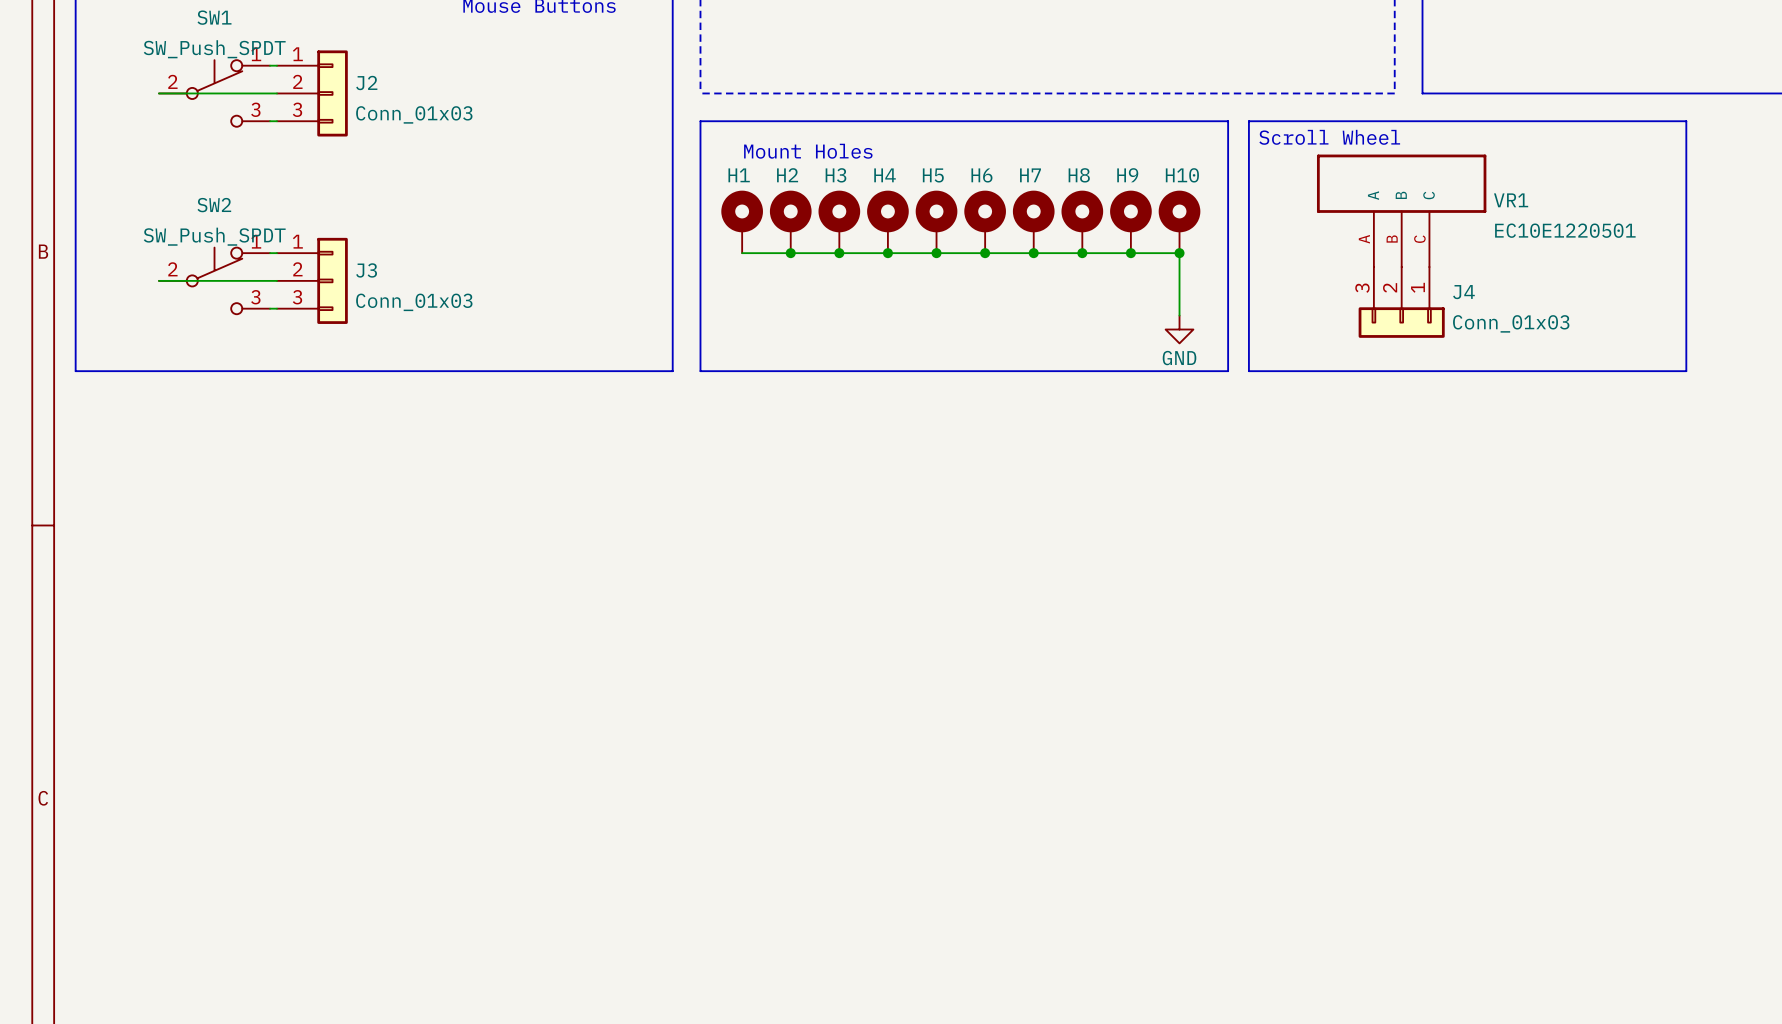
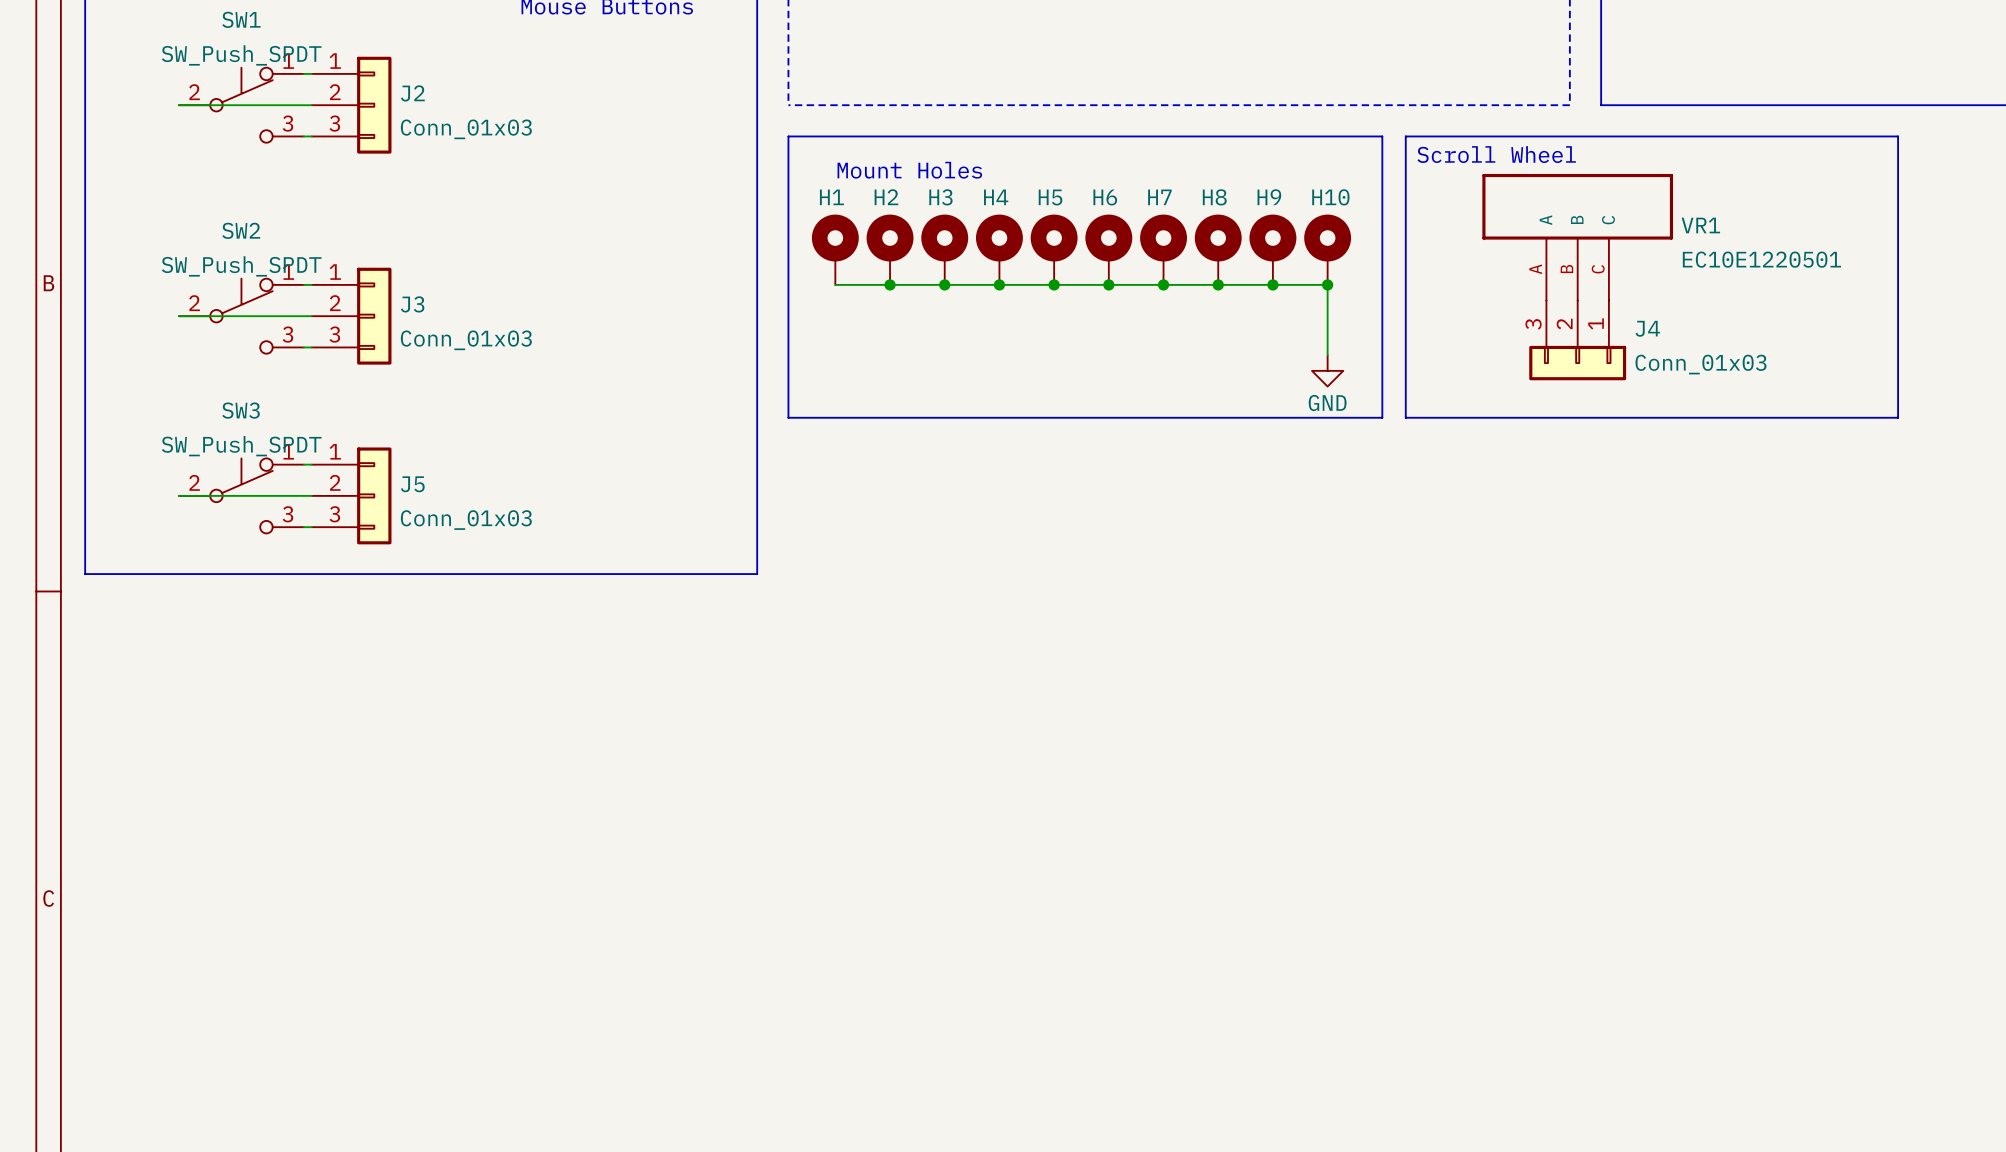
line: (75, 371) (672, 371) -> (85, 417) (85, 574) (757, 574) (757, 417)
wire: none -> (303, 464) (311, 464)
wire: none -> (178, 495) (311, 495)
SW3: none -> SW_Push_SPDT (241, 495)
J5: none -> Conn_01x03 (351, 495)
wire: none -> (303, 527) (311, 527)

